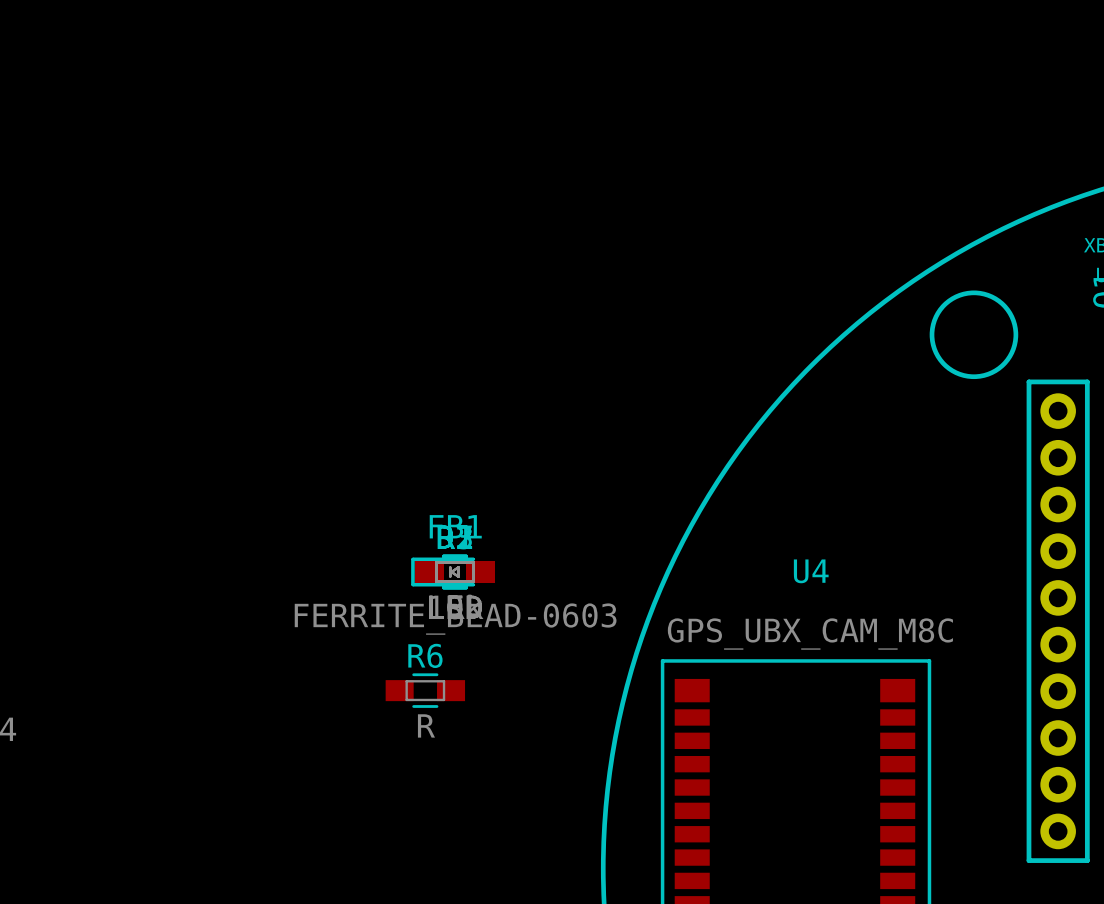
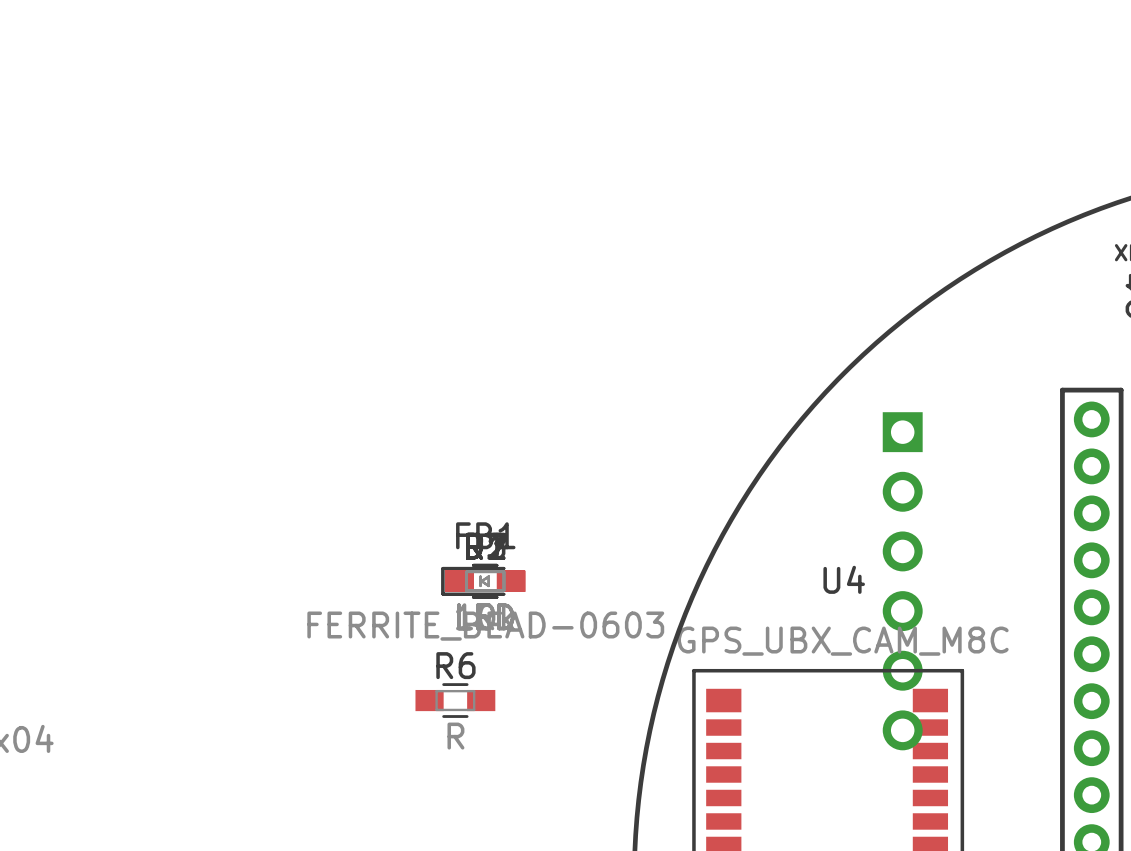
drawing: [929, 290, 1019, 380] -> none
part: none -> (902, 581)

